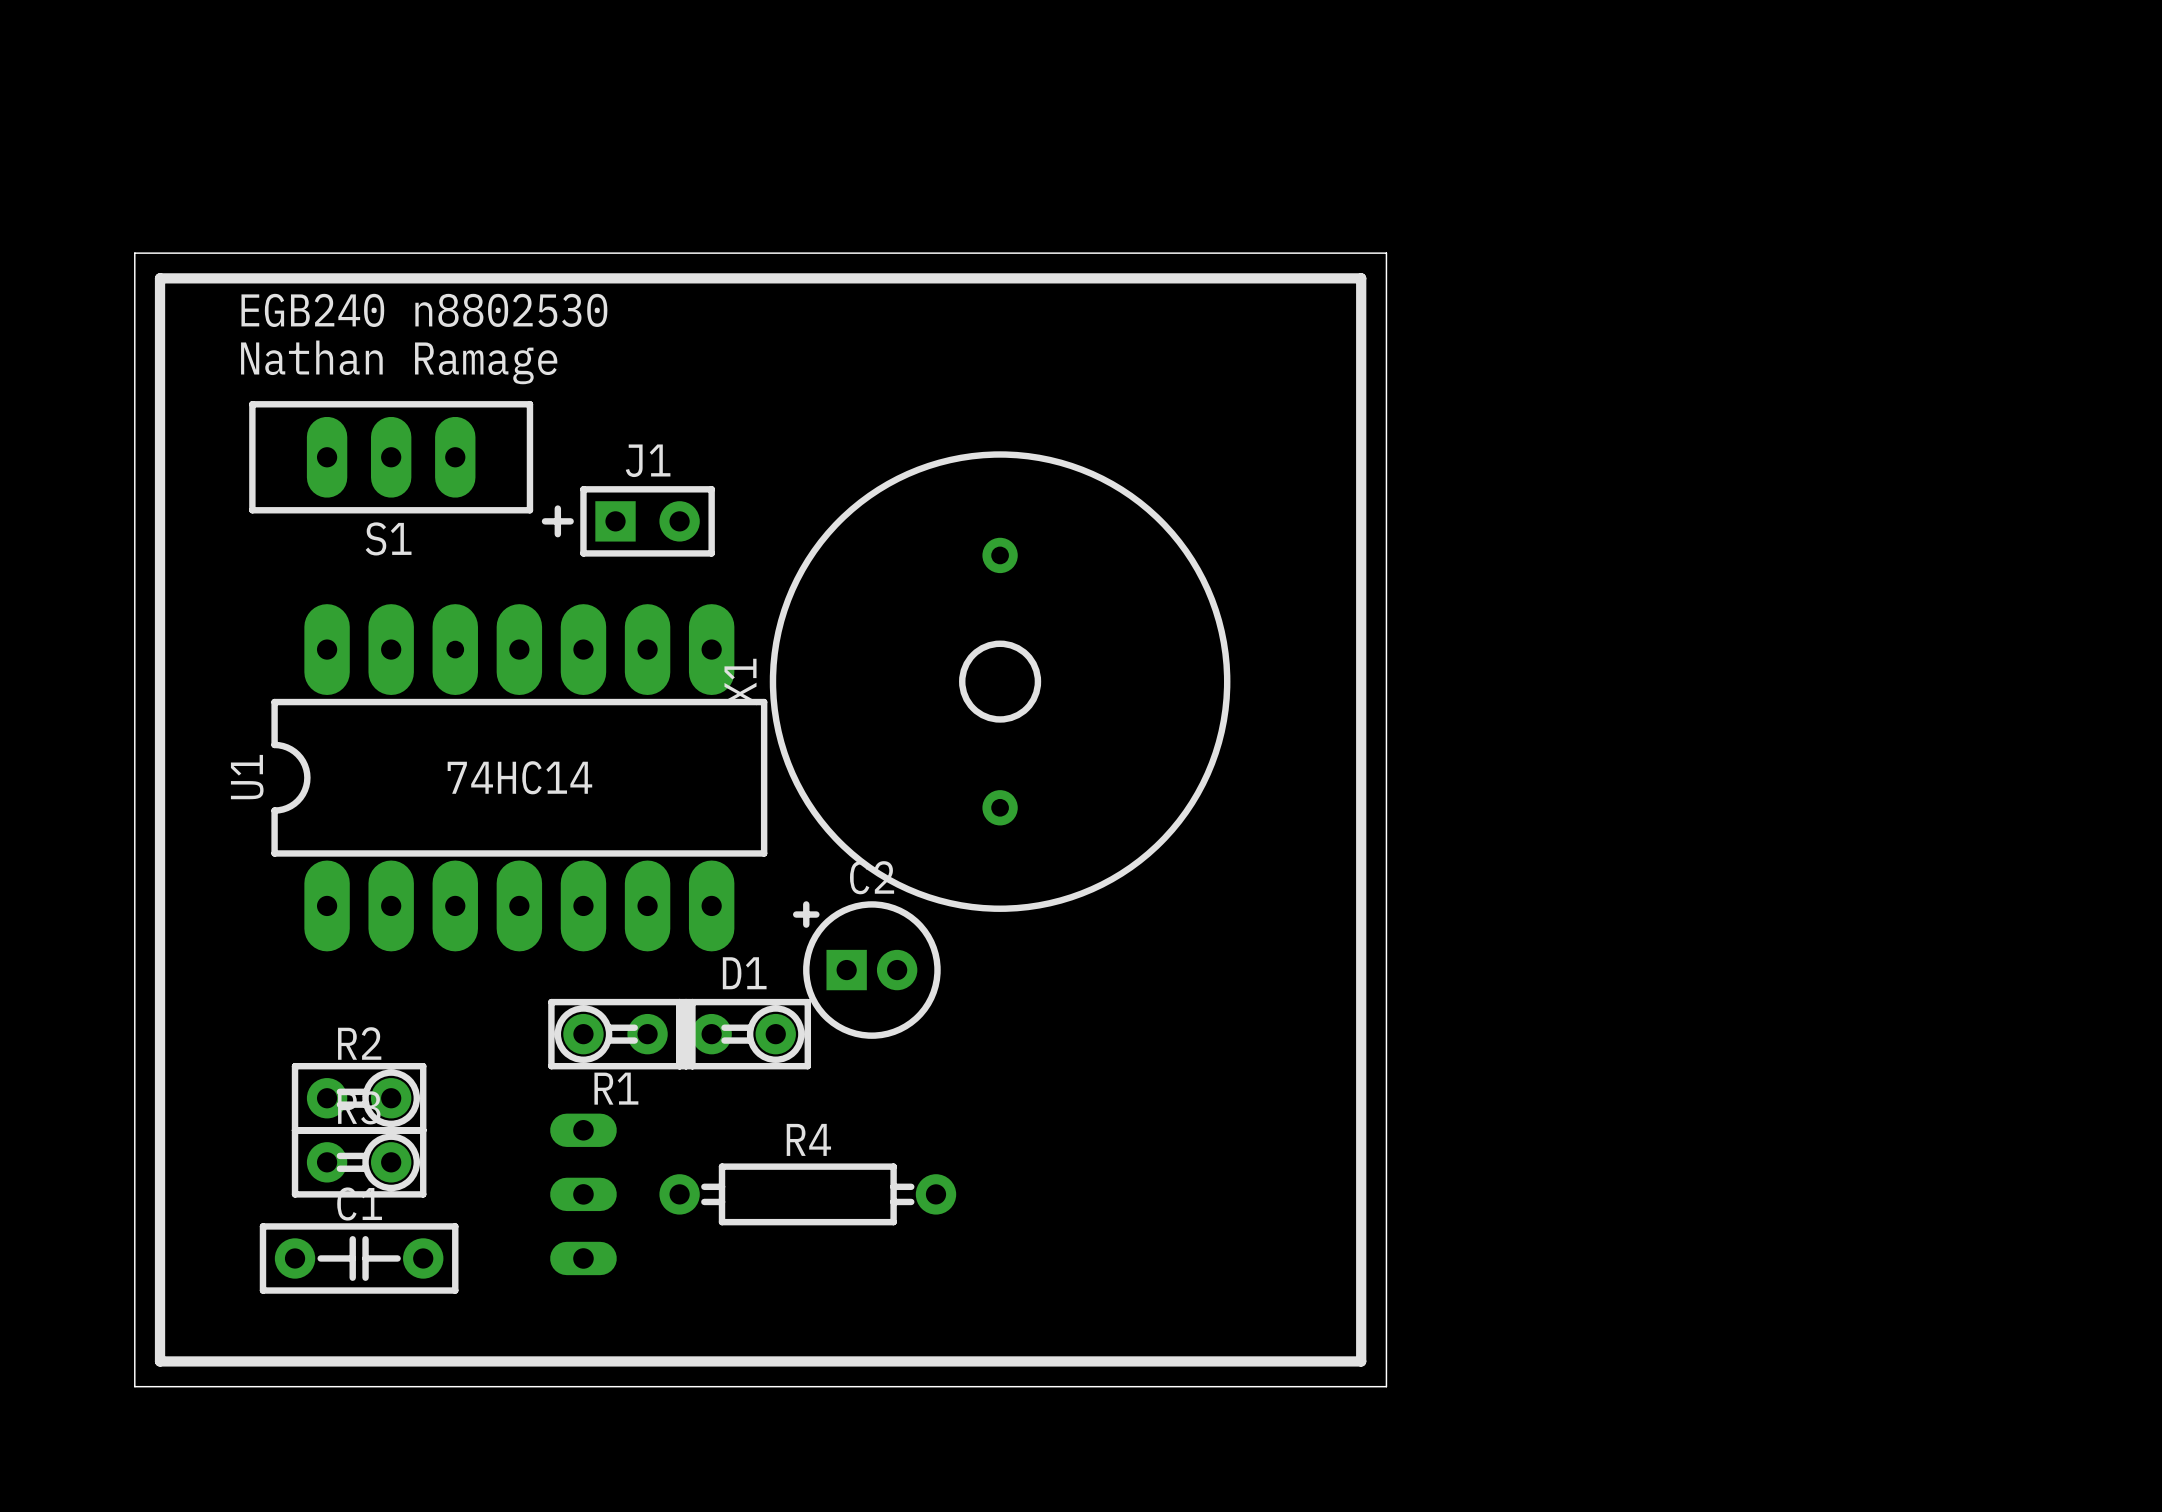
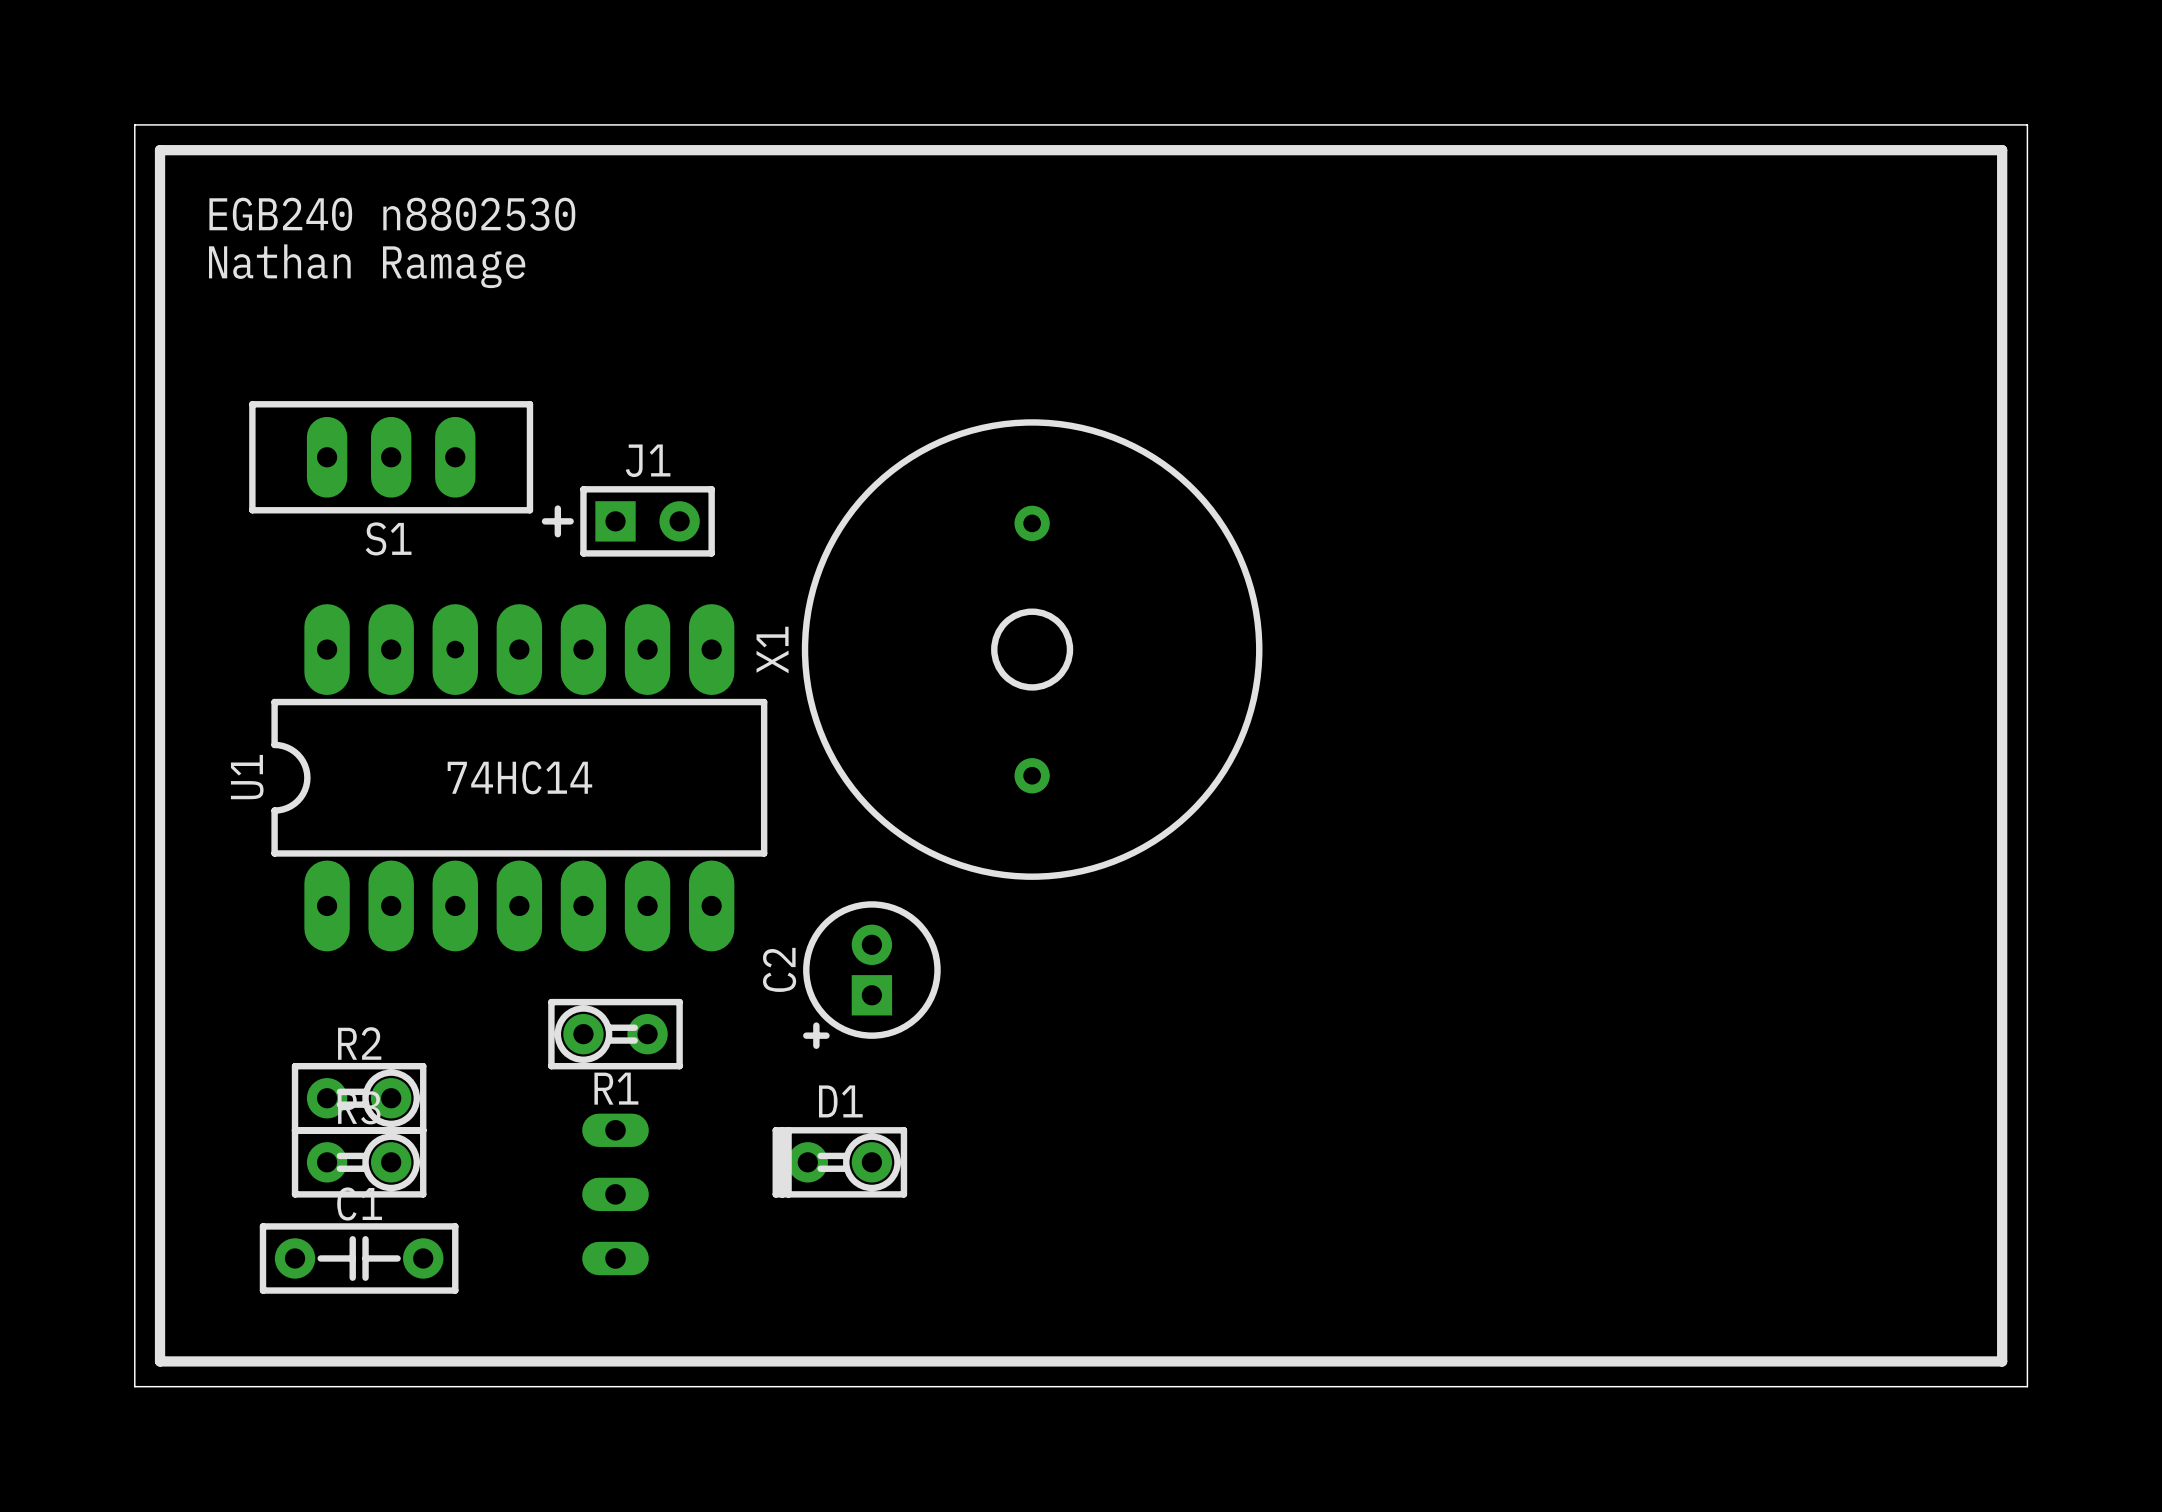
board edge: (134, 253) (1386, 253) (1386, 1386) -> (134, 253) (134, 124) (2027, 124) (2027, 1386) (1386, 1386)
line: (160, 278) (1361, 278) (1361, 1361) -> (160, 278) (160, 150) (2002, 150) (2002, 1361) (1361, 1361)
text position: EGB240 n8802530 (424, 310) -> EGB240 n8802530 (392, 214)
text position: Nathan Ramage (399, 362) -> Nathan Ramage (367, 266)
X1 position: (1000, 681) -> (1032, 649)
C2 rotation: 0° (866, 970) -> 90° counterclockwise (871, 975)
D1 position: (743, 1034) -> (839, 1162)
part position: (583, 1194) -> (615, 1194)
R4: (807, 1194) -> none

